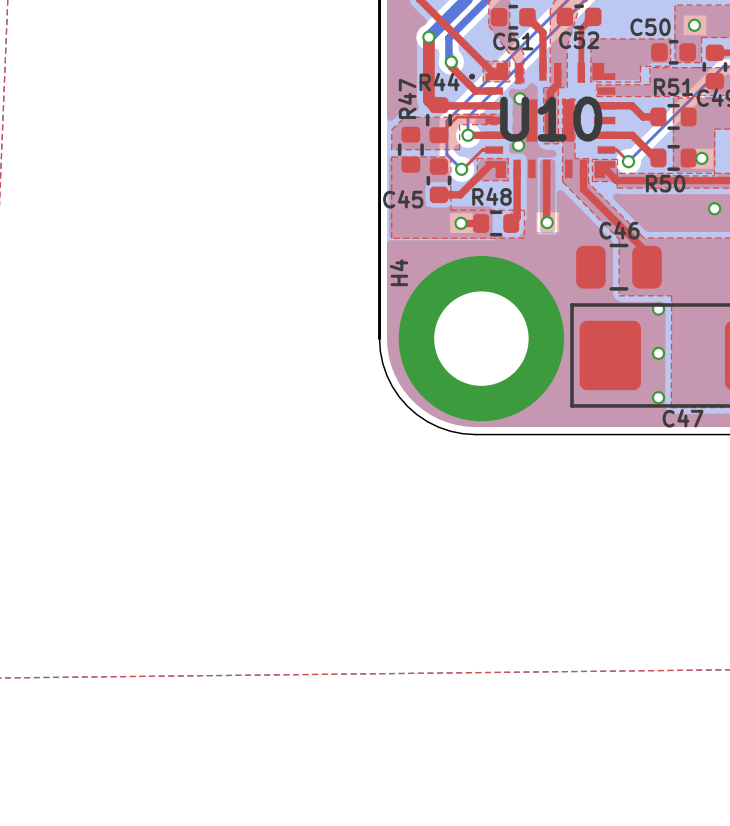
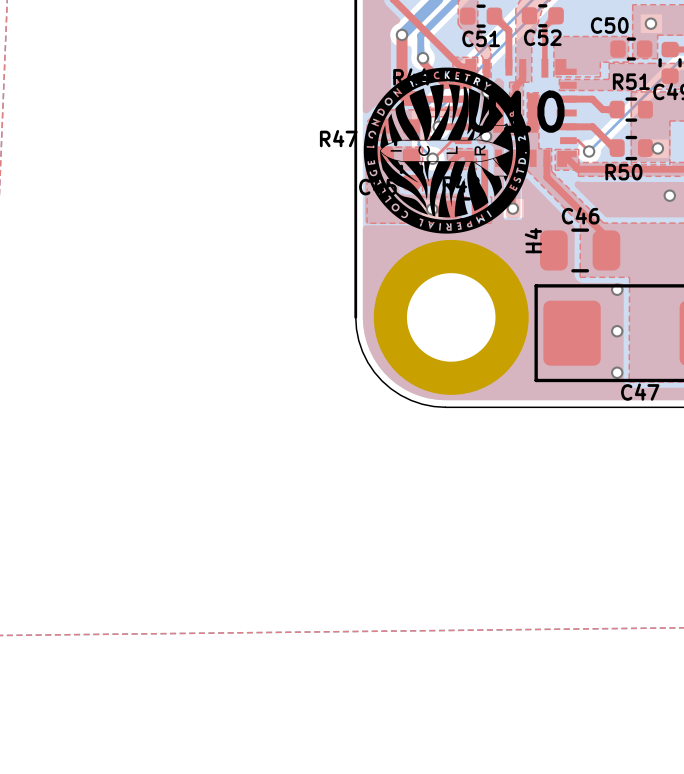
drawing: none -> [363, 67, 530, 234]
R47 name rotation: 0° (407, 98) -> 90° clockwise (338, 138)
R47 name position: R47 (407, 98) -> R47 (338, 138)
H4 name position: H4 (399, 272) -> H4 (533, 240)

